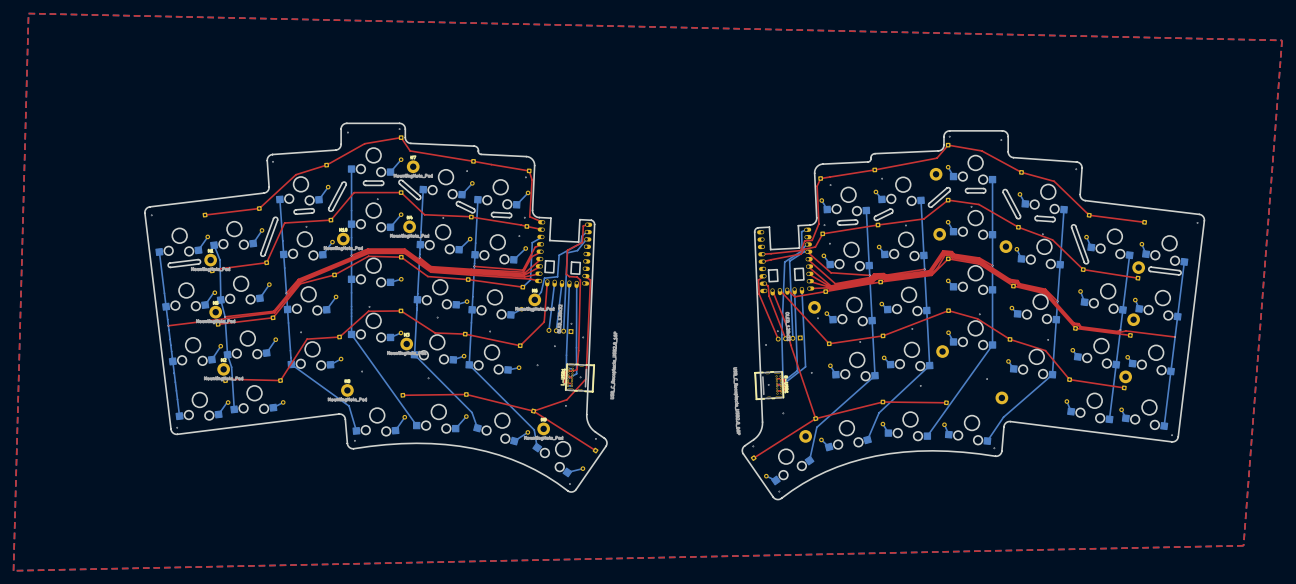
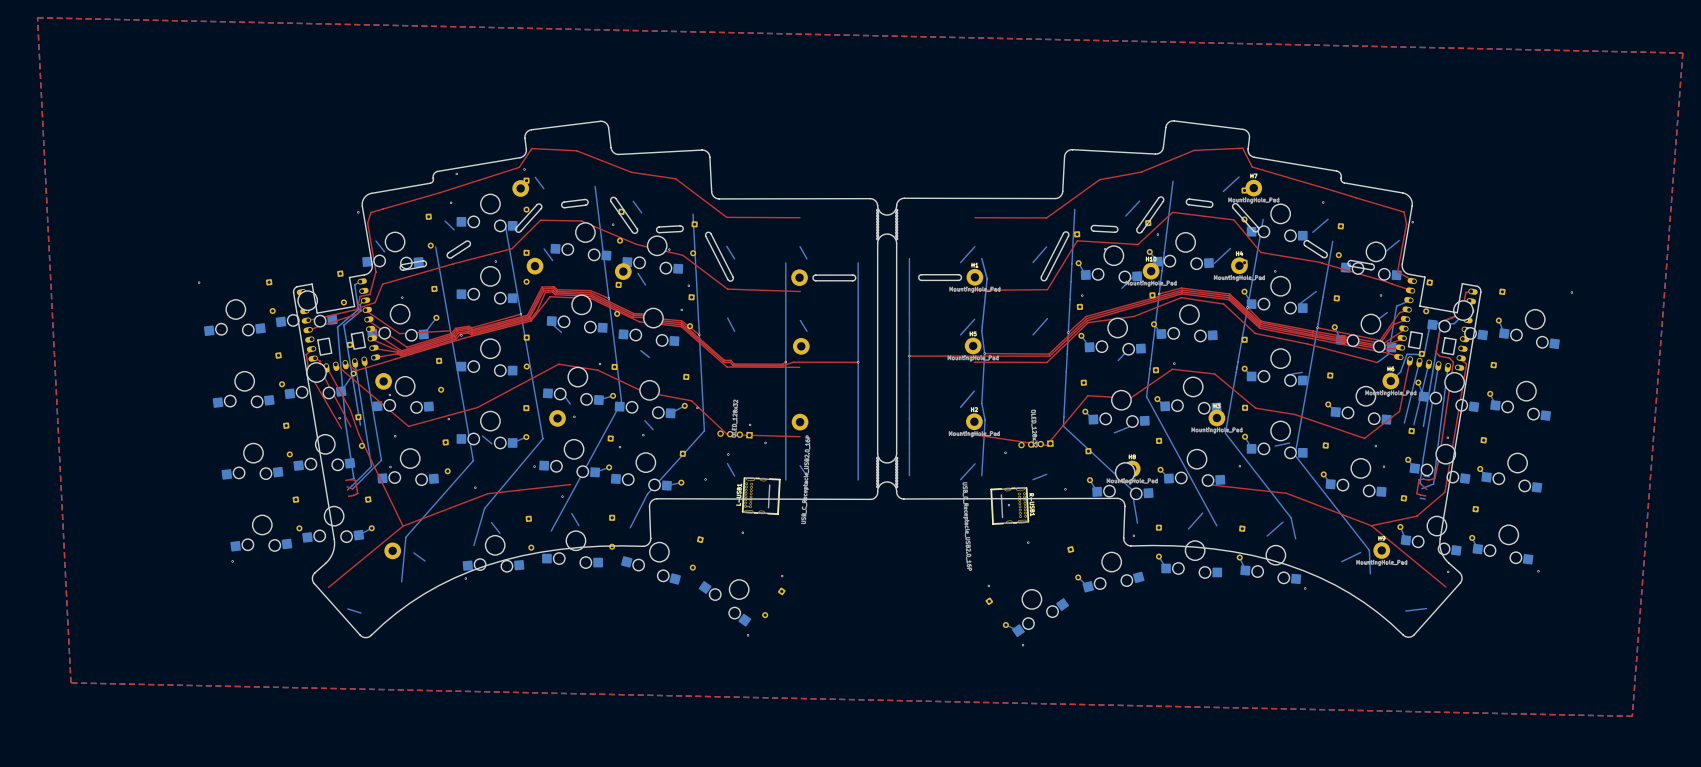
top zone outline: (28, 13) (13, 570) (1243, 545) -> (37, 17) (70, 682) (1632, 716)
bottom track: none -> (1239, 176) (1223, 191)
bottom track: none -> (535, 177) (543, 188)
via: (949, 136) -> none
bottom track: none -> (1173, 181) (1146, 396) (1216, 525)
via position: (1001, 140) -> (1323, 202)
bottom track: none -> (595, 186) (621, 401) (551, 531)
part: none -> (520, 188)
board edge: none -> (1158, 198) (1137, 228) (1138, 232) (1141, 232) (1163, 201) (1162, 197) (1158, 198)
board edge: none -> (584, 199) (563, 202) (561, 205) (564, 207) (585, 205) (588, 201) (584, 199)
board edge: none -> (615, 198) (637, 229) (636, 233) (632, 232) (611, 201) (612, 197) (615, 198)
board edge: none -> (1189, 199) (1210, 201) (1212, 205) (1209, 207) (1188, 204) (1186, 201) (1189, 199)
bottom track: none -> (633, 201) (641, 212)
bottom track: none -> (1139, 201) (1125, 216)
via: none -> (451, 202)
board edge: none -> (1237, 204) (1258, 227) (1257, 231) (1253, 231) (1233, 208) (1233, 204) (1237, 204)
board edge: none -> (536, 204) (516, 227) (516, 231) (520, 231) (541, 208) (540, 204) (536, 204)
board edge: none -> (877, 205) (875, 200) (870, 198) (717, 198) (712, 193) (709, 156) (705, 150) (616, 154) (611, 148) (607, 125) (601, 121) (531, 129) (525, 134) (526, 151) (521, 157) (437, 171) (433, 174) (433, 180) (430, 183) (371, 193) (365, 196) (362, 205) (372, 266) (369, 272) (364, 274)
board edge: none -> (896, 205) (899, 200) (904, 198) (1057, 198) (1062, 193) (1064, 155) (1069, 150) (1158, 153) (1163, 148) (1166, 125) (1172, 120) (1242, 129) (1248, 133) (1248, 150) (1252, 156) (1337, 171) (1340, 173) (1341, 180) (1343, 182) (1402, 192) (1408, 195) (1412, 204) (1402, 266) (1404, 271) (1409, 274)
bottom track: (401, 159) (390, 172) -> none
bottom track: none -> (1074, 209) (1063, 426) (1131, 489) (1137, 523)
bottom track: none -> (693, 214) (704, 430) (647, 494) (630, 527)
top track: none -> (800, 217) (726, 217) (675, 178) (631, 172) (576, 150) (531, 148) (519, 167) (370, 212) (367, 223) (376, 272)
top track: none -> (974, 217) (1046, 217) (1099, 179) (1141, 172) (1194, 150) (1242, 148) (1252, 167) (1404, 212) (1406, 224) (1397, 271) (1414, 281)
part position: (413, 166) -> (1253, 188)
bottom track: none -> (1263, 219) (1225, 433) (1291, 517) (1295, 538)
bottom track: none -> (1328, 219) (1312, 232)
bottom track: none -> (445, 221) (454, 229)
bottom track: (351, 169) (351, 334) (416, 425) -> none
bottom track: none -> (505, 224) (542, 438) (484, 508) (473, 545)
part: none -> (887, 224)
board edge: none -> (1094, 225) (1115, 226) (1117, 229) (1115, 232) (1093, 231) (1091, 228) (1094, 225)
board edge: none -> (680, 225) (658, 227) (656, 230) (659, 232) (680, 231) (683, 228) (680, 225)
part: (936, 174) -> none
via: (525, 177) -> none
board edge: none -> (1063, 233) (1041, 276) (1042, 280) (1046, 279) (1068, 236) (1067, 232) (1063, 233)
board edge: none -> (710, 233) (732, 276) (731, 280) (727, 279) (705, 236) (707, 232) (710, 233)
bottom track: (992, 179) (992, 345) (927, 436) -> none
board edge: (402, 180) (420, 196) (420, 199) (417, 199) (399, 183) (399, 180) (402, 180) -> none
board edge: (365, 181) (381, 181) (383, 183) (381, 185) (365, 185) (363, 182) (365, 181) -> none
bottom track: none -> (375, 240) (384, 251)
board edge: (342, 183) (328, 208) (330, 211) (332, 210) (346, 184) (345, 182) (342, 183) -> none
board edge: none -> (466, 241) (448, 253) (447, 257) (451, 257) (469, 246) (469, 242) (466, 241)
bottom track: (472, 183) (462, 194) -> none
board edge: none -> (1308, 241) (1326, 252) (1326, 256) (1323, 257) (1305, 245) (1304, 241) (1308, 241)
bottom track: none -> (1332, 241) (1295, 455) (1369, 550) (1370, 573)
bottom track: none -> (1399, 240) (1382, 254)
board edge: none -> (877, 243) (877, 453)
board edge: none -> (896, 243) (896, 453)
via position: (830, 185) -> (1105, 249)
bottom track: (328, 187) (318, 199) -> none
bottom track: none -> (726, 246) (734, 258)
bottom track: none -> (800, 246) (806, 258)
bottom track: none -> (974, 246) (960, 262)
bottom track: none -> (435, 246) (473, 460) (405, 537) (401, 581)
bottom track: none -> (1046, 246) (1032, 262)
board edge: (946, 188) (929, 203) (929, 206) (931, 206) (949, 191) (949, 188) (946, 188) -> none
board edge: (967, 188) (983, 188) (985, 191) (983, 192) (967, 192) (965, 190) (967, 188) -> none
bottom track: none -> (544, 248) (552, 260)
bottom track: (423, 189) (414, 354) (472, 412) (477, 428) -> none
bottom track: none -> (1230, 248) (1214, 263)
via: none -> (669, 249)
board edge: (1007, 190) (1020, 215) (1019, 218) (1016, 217) (1003, 192) (1004, 189) (1007, 190) -> none
bottom track: (528, 192) (516, 204) -> none
bottom track: (1019, 194) (1025, 203) -> none
bottom track: none -> (909, 258) (909, 475)
bottom track: none -> (981, 258) (987, 278) (981, 330) (984, 353) (981, 403) (985, 420) (981, 475)
board edge: none -> (423, 260) (402, 264) (400, 268) (403, 270) (424, 266) (426, 262) (423, 260)
board edge: none -> (1351, 260) (1372, 264) (1374, 267) (1371, 269) (1350, 266) (1348, 262) (1351, 260)
bottom track: (279, 199) (291, 364) (349, 406) (356, 430) -> none
bottom track: (477, 199) (469, 364) (534, 429) (537, 447) -> none
bottom track: none -> (785, 262) (785, 480)
bottom track: none -> (858, 262) (858, 480)
bottom track: (921, 200) (929, 365) (879, 412) (867, 439) -> none
top track: none -> (1321, 262) (1412, 290)
top track: none -> (1321, 262) (1260, 252) (1233, 219) (1172, 212) (1138, 244) (1077, 240) (1047, 289) (974, 290)
board edge: (459, 201) (474, 208) (474, 211) (472, 212) (457, 205) (456, 202) (459, 201) -> none
part: none -> (535, 266)
part: none -> (623, 271)
top track: none -> (375, 271) (369, 294) (360, 296) (356, 309) (308, 320)
board edge: (311, 208) (295, 209) (294, 212) (296, 214) (312, 213) (314, 210) (311, 208) -> none
bottom track: none -> (637, 273) (645, 285)
bottom track: none -> (1136, 273) (1121, 288)
board edge: none -> (815, 275) (853, 275) (855, 278) (852, 280) (815, 280) (813, 277) (815, 275)
board edge: none -> (921, 274) (958, 274) (961, 277) (958, 280) (921, 280) (918, 277) (921, 274)
board edge: (889, 209) (875, 216) (874, 219) (877, 220) (891, 213) (892, 210) (889, 209) -> none
bottom track: (1064, 209) (1052, 374) (1003, 417) (987, 441) -> none
bottom track: (866, 210) (875, 375) (816, 427) (809, 460) -> none
part: none -> (799, 277)
board edge: (493, 212) (509, 213) (511, 215) (509, 217) (493, 216) (491, 214) (493, 212) -> none
bottom track: none -> (360, 281) (354, 284) (358, 309) (337, 327) (345, 422) (353, 478) (350, 479)
bottom track: (401, 214) (390, 227) -> none
top track: (205, 215) (259, 208) (296, 174) (326, 165) (364, 143) (401, 137) (410, 150) (529, 170) (532, 179) (529, 216) (543, 222) -> none
top track: (471, 216) (424, 214) (401, 192) (354, 192) (330, 220) (284, 223) (266, 262) (211, 269) -> none
board edge: (1037, 216) (1053, 217) (1055, 219) (1053, 221) (1036, 220) (1034, 218) (1037, 216) -> none
via: (443, 217) -> none
top track: (471, 217) (542, 229) -> none
board edge: (539, 217) (535, 215) (532, 211) (534, 164) (530, 158) (480, 154) (474, 146) (409, 143) (405, 139) (404, 126) (399, 123) (345, 123) (341, 127) (341, 145) (337, 149) (270, 155) (267, 159) (269, 188) (265, 192) (147, 207) (144, 213) (171, 431) (177, 434) (340, 414) (345, 418) (347, 444) (351, 448) (416, 443) (473, 448) (499, 455) (523, 464) (546, 476) (568, 491) (574, 491) (606, 443) (605, 439) (590, 427) (586, 416) (594, 224) (591, 220) -> none
board edge: none -> (297, 286) (293, 292) (334, 541) (331, 556) (313, 574) (312, 579) (363, 637) (369, 636) (396, 612) (424, 593) (454, 577) (487, 565) (522, 555) (560, 549) (646, 545) (650, 539) (649, 504) (655, 498) (870, 499) (875, 496) (877, 491)
board edge: (273, 218) (260, 253) (262, 256) (264, 254) (277, 220) (276, 217) (273, 218) -> none
board edge: none -> (1477, 286) (1480, 292) (1439, 540) (1443, 556) (1460, 573) (1461, 579) (1411, 636) (1404, 636) (1377, 612) (1349, 593) (1319, 577) (1286, 564) (1251, 555) (1213, 548) (1128, 545) (1123, 539) (1124, 504) (1119, 498) (903, 498) (898, 496) (896, 491)
board edge: (855, 219) (839, 220) (837, 223) (839, 225) (856, 224) (857, 221) (855, 219) -> none
top track: none -> (1471, 291) (1465, 292) (1462, 313) (1441, 321) (1436, 352) (1439, 356) (1449, 358) (1453, 362) (1434, 478) (1419, 479) (1416, 493) (1425, 495)
top track: none -> (800, 291) (727, 289) (682, 255) (636, 244) (581, 220) (540, 220) (512, 248) (382, 284) (375, 302) (360, 307) (357, 313) (310, 329)
bottom track: none -> (1316, 291) (1300, 303)
top track: (1144, 222) (1089, 215) (1054, 181) (1021, 172) (981, 150) (948, 145) (936, 158) (820, 178) (817, 186) (818, 224) -> none
top track: (818, 223) (812, 240) (804, 240) (801, 250) (763, 254) -> none
top track: none -> (1159, 293) (1181, 288) (1229, 293) (1260, 322) (1380, 345) (1405, 328)
via: none -> (1159, 293)
top track: (587, 224) (583, 226) (582, 242) (567, 250) (566, 274) (580, 279) (577, 369) (565, 371) (564, 382) (571, 383) -> none
board edge: (809, 225) (814, 223) (816, 219) (814, 172) (818, 165) (868, 161) (874, 153) (939, 150) (943, 146) (944, 133) (949, 130) (1003, 131) (1007, 134) (1008, 152) (1011, 157) (1078, 162) (1082, 167) (1080, 195) (1083, 200) (1201, 215) (1204, 220) (1177, 439) (1171, 441) (1009, 421) (1004, 425) (1001, 451) (997, 456) (932, 450) (876, 456) (850, 462) (825, 471) (802, 483) (780, 498) (775, 498) (742, 450) (743, 446) (758, 434) (762, 423) (754, 232) (757, 227) -> none
via: (905, 225) -> none
part position: (409, 226) -> (1239, 265)
board edge: (1075, 226) (1088, 260) (1087, 263) (1084, 262) (1071, 227) (1072, 224) (1075, 226) -> none
top track: none -> (608, 298) (590, 290) (557, 289) (554, 286) (542, 287) (527, 315) (472, 329) (468, 327) (456, 329) (452, 334) (401, 350) (368, 329)
via: none -> (608, 298)
bottom track: none -> (1410, 300) (1396, 306) (1388, 354) (1377, 362)
bottom track: none -> (363, 300) (360, 304) (361, 310) (343, 325) (360, 425)
bottom track: (806, 229) (801, 231) (802, 250) (784, 262) (781, 334) (782, 378) (780, 378) -> none
bottom track: none -> (1469, 300) (1462, 305) (1460, 314) (1429, 326) (1424, 354) (1406, 354) (1400, 371) (1390, 380)
bottom track: (262, 230) (253, 243) -> none
bottom track: (586, 232) (581, 236) (580, 243) (559, 255) (557, 276) (544, 278) (541, 292) (534, 299) -> none
part: (939, 234) -> none
top track: none -> (1247, 307) (1261, 321) (1380, 343) (1393, 324) (1407, 319)
via: none -> (1247, 307)
via position: (1042, 234) -> (1380, 295)
bottom track: (207, 236) (198, 250) -> none
top track: none -> (365, 310) (399, 333) (450, 330)
top track: none -> (1409, 309) (1399, 312) (1380, 340) (1317, 327)
bottom track: none -> (1467, 310) (1454, 323) (1440, 324) (1423, 426)
bottom track: (542, 237) (532, 242) (530, 279) (522, 287) -> none
bottom track: (1086, 237) (1091, 247) -> none
bottom track: none -> (1387, 312) (1369, 325)
part position: (343, 239) -> (1151, 271)
top track: none -> (520, 314) (472, 327) (468, 326) (455, 328) (451, 333) (407, 347) (367, 319)
via: none -> (520, 314)
bottom track: (470, 239) (459, 249) -> none
bottom track: (586, 239) (577, 250) (567, 252) (563, 331) -> none
bottom track: none -> (727, 318) (734, 331)
bottom track: none -> (1047, 318) (1032, 334)
bottom track: none -> (974, 319) (960, 334)
via: (829, 243) -> none
top track: (541, 244) (535, 247) (522, 270) (474, 266) -> none
bottom track: none -> (800, 320) (806, 331)
bottom track: (806, 244) (803, 247) (803, 251) (789, 261) (792, 338) -> none
bottom track: (214, 245) (220, 260) (220, 299) (225, 316) (227, 354) (231, 367) (234, 409) -> none
part: none -> (338, 323)
part: (1005, 246) -> none
part: none -> (1435, 323)
bottom track: none -> (553, 325) (561, 332)
bottom track: (525, 248) (513, 259) -> none
via: none -> (1317, 327)
bottom track: (159, 251) (179, 416) -> none
top track: (541, 251) (531, 256) (523, 272) (431, 266) (419, 257) -> none
top track: (807, 251) (831, 272) (869, 275) -> none
part: (563, 252) -> none
top track: none -> (1068, 332) (1086, 316) (1182, 290) (1229, 295) (1260, 324) (1380, 347) (1404, 338)
via: none -> (1068, 332)
top track: (351, 255) (367, 249) (404, 249) (430, 267) (523, 274) (541, 259) -> none
top track: none -> (699, 334) (681, 320) (647, 317) (644, 313) (634, 313) (590, 292) (556, 291) (553, 288) (543, 288) (528, 316) (472, 331) (468, 329) (457, 331) (453, 336) (401, 352) (370, 338)
via: none -> (699, 334)
bottom track: (1129, 255) (1109, 419) -> none
via: (419, 257) -> none
board edge: (198, 259) (169, 263) (168, 265) (170, 267) (198, 263) (200, 261) (198, 259) -> none
top track: (807, 259) (835, 283) (870, 277) (873, 273) (886, 275) (924, 269) -> none
part position: (210, 260) -> (974, 277)
part: (785, 260) -> none
top track: (763, 261) (801, 253) (803, 249) (815, 247) (822, 233) (923, 218) (948, 200) (978, 204) (1018, 227) (1052, 239) (1083, 269) (1137, 278) -> none
bottom track: (1184, 261) (1164, 426) -> none
part: none -> (801, 346)
bottom track: none -> (1132, 345) (1118, 360)
top track: none -> (313, 348) (306, 354) (309, 373) (341, 428)
top track: none -> (372, 348) (401, 354) (454, 337) (458, 332) (468, 331) (471, 333) (529, 317) (543, 290) (553, 290) (556, 292) (590, 294) (633, 315) (643, 315) (646, 319) (681, 322) (724, 360) (730, 360) (734, 363) (782, 364) (785, 362)
top track: (992, 265) (979, 258) (943, 250) (929, 270) (886, 276) (874, 275) (870, 278) (831, 285) (808, 266) -> none
via: (992, 265) -> none
top track: none -> (1402, 347) (1381, 349) (1260, 326) (1229, 297) (1181, 291) (1086, 318) (1048, 354) (984, 353)
via: (474, 266) -> none
top track: (540, 266) (523, 275) (430, 269) (404, 250) (368, 250) (298, 279) (286, 293) -> none
bottom track: none -> (640, 350) (649, 357)
part: (1138, 267) -> none
board edge: (1151, 267) (1179, 270) (1181, 273) (1178, 274) (1150, 271) (1148, 268) (1151, 267) -> none
via: none -> (984, 353)
via: (924, 269) -> none
top track: none -> (909, 356) (1049, 356) (1087, 320) (1181, 293) (1228, 299) (1259, 328) (1388, 353) (1400, 357)
via: none -> (909, 356)
top track: none -> (315, 358) (319, 361) (322, 374) (350, 426)
top track: none -> (373, 357) (397, 353) (401, 355) (455, 339) (460, 334) (468, 332) (471, 334) (530, 319) (537, 310) (545, 292) (552, 291) (555, 294) (590, 296) (633, 317) (642, 317) (646, 320) (681, 324) (724, 362) (730, 362) (733, 365) (782, 365) (793, 362) (858, 362)
top track: none -> (1459, 357) (1466, 364) (1444, 492) (1416, 516) (1371, 525)
bottom track: none -> (364, 359) (381, 460) (352, 489)
top track: (540, 273) (524, 276) (430, 270) (404, 251) (368, 251) (299, 280) (273, 311) (225, 316) -> none
top track: (808, 273) (830, 287) (871, 279) (875, 276) (886, 277) (930, 271) (943, 252) (951, 252) (953, 255) (979, 259) (1010, 279) (1018, 280) (1020, 283) (1045, 289) (1057, 301) -> none
top track: none -> (1410, 359) (1399, 411) (1364, 438) (1294, 414) (1255, 408) (1214, 374) (1172, 369) (1130, 398) (1087, 395) (1046, 445) (975, 434)
bottom track: none -> (1419, 360) (1404, 423)
bottom track: none -> (354, 361) (371, 466) (347, 489)
via: none -> (785, 362)
top track: none -> (974, 362) (1047, 362) (1088, 322) (1133, 316) (1181, 297) (1223, 304) (1255, 333) (1307, 343) (1377, 362)
via: (869, 275) -> none
top track: none -> (345, 362) (356, 370) (465, 337) (531, 320) (550, 296) (591, 298) (639, 321) (681, 326) (726, 367) (799, 367)
top track: (584, 276) (590, 280) (585, 379) (567, 399) (533, 411) -> none
via: none -> (858, 362)
top track: (764, 276) (758, 280) (759, 294) (778, 339) -> none
bottom track: none -> (1429, 362) (1413, 424)
top track: none -> (335, 364) (408, 426) (477, 407) (558, 364) (597, 370) (643, 391) (691, 400) (727, 434) (800, 436)
via: none -> (600, 363)
via: none -> (1174, 363)
bottom track: none -> (1438, 364) (1423, 458) (1420, 483) (1422, 485)
top track: none -> (326, 366) (350, 410) (358, 434) (403, 526)
bottom track: none -> (1448, 365) (1433, 484) (1421, 488)
bottom track: (401, 279) (390, 282) -> none
top track: (540, 281) (430, 272) (404, 253) (368, 253) (299, 282) (274, 312) (168, 325) -> none
top track: (547, 281) (544, 322) (520, 345) (465, 334) (435, 332) (401, 310) (368, 311) (339, 337) (307, 339) (280, 380) (225, 379) -> none
bottom track: (554, 281) (548, 330) -> none
top track: (808, 281) (830, 288) (872, 280) (875, 277) (885, 279) (930, 273) (944, 253) (951, 254) (953, 256) (978, 260) (1009, 280) (1017, 281) (1019, 284) (1045, 290) (1074, 323) (1079, 323) (1081, 326) (1117, 331) (1120, 330) -> none
bottom track: (562, 282) (556, 330) -> none
bottom track: (569, 282) (566, 355) (566, 374) (568, 375) -> none
bottom track: (576, 283) (576, 373) (568, 378) -> none
top track: (764, 283) (768, 286) (769, 296) (785, 338) -> none
bottom track: none -> (1302, 372) (1287, 374)
top track: (522, 287) (427, 276) (401, 257) (368, 256) (334, 274) (300, 283) (273, 317) (218, 324) -> none
bottom track: (801, 288) (805, 366) (781, 385) -> none
top track: (809, 288) (827, 287) (830, 289) (872, 282) (876, 278) (885, 280) (931, 274) (945, 255) (950, 255) (952, 257) (978, 262) (1018, 286) (1044, 292) (1073, 324) (1078, 325) (1080, 327) (1175, 337) -> none
top track: (787, 289) (794, 296) (931, 275) (948, 258) (979, 264) (1013, 286) (1044, 293) (1075, 328) (1130, 335) -> none
bottom track: (794, 289) (797, 370) (777, 386) -> none
part: none -> (383, 381)
top track: (772, 290) (786, 326) (790, 345) (815, 418) -> none
top track: (779, 290) (829, 343) (883, 335) (948, 310) (977, 318) (1010, 339) (1045, 350) (1069, 379) (1124, 387) -> none
bottom track: (214, 291) (205, 304) -> none
via position: (286, 293) -> (389, 395)
bottom track: (336, 296) (326, 309) -> none
bottom track: none -> (974, 391) (960, 407)
bottom track: none -> (562, 392) (570, 404)
part position: (534, 299) -> (1390, 380)
via: (369, 306) -> none
part: (814, 307) -> none
part position: (215, 312) -> (973, 345)
via: (979, 314) -> none
via: (225, 316) -> none
via: none -> (339, 418)
part: none -> (557, 418)
via: (817, 318) -> none
via: none -> (448, 419)
part: (1133, 319) -> none
bottom track: none -> (644, 420) (653, 429)
part: none -> (800, 422)
via: (168, 325) -> none
bottom track: none -> (1129, 427) (1114, 432)
via: (912, 328) -> none
via: (1120, 330) -> none
via: (777, 331) -> none
bottom track: none -> (482, 436) (491, 443)
via: none -> (1447, 437)
bottom track: none -> (1289, 442) (1275, 446)
via: (1175, 337) -> none
bottom track: (275, 339) (266, 352) -> none
via: none -> (619, 447)
via: (860, 341) -> none
part position: (406, 344) -> (1216, 418)
bottom track: (220, 346) (211, 359) -> none
part: (942, 351) -> none
bottom track: none -> (727, 463) (734, 476)
bottom track: none -> (975, 463) (960, 479)
bottom track: none -> (800, 465) (806, 476)
via: none -> (390, 467)
via: none -> (534, 466)
via: none -> (1239, 466)
via: none -> (1383, 466)
bottom track: (341, 359) (330, 364) -> none
part: none -> (887, 472)
bottom track: none -> (1046, 474) (1032, 479)
bottom track: none -> (1424, 475) (1429, 476)
top track: none -> (345, 480) (355, 480) (357, 493) (348, 496)
bottom track: (568, 368) (572, 368) -> none
top track: none -> (1203, 484) (1286, 493) (1371, 525)
part position: (223, 369) -> (974, 421)
top track: none -> (570, 484) (487, 493) (403, 526)
top track: none -> (1422, 485) (1426, 489)
top track: none -> (346, 486) (352, 489)
top track: (568, 375) (572, 378) -> none
part: (1125, 376) -> none
via: (580, 377) -> none
top track: (776, 378) (783, 379) (784, 389) (777, 391) -> none
via: (987, 379) -> none
bottom track: none -> (1420, 498) (1425, 499)
top track: (777, 383) (781, 385) -> none
via: (920, 385) -> none
part position: (347, 390) -> (1132, 468)
bottom track: none -> (1202, 513) (1188, 529)
bottom track: none -> (571, 513) (578, 525)
top track: (402, 395) (466, 394) (533, 411) -> none
bottom track: none -> (1283, 522) (1267, 536)
part: (1001, 397) -> none
bottom track: none -> (491, 522) (499, 533)
top track: none -> (403, 526) (328, 587)
top track: none -> (1371, 525) (1445, 587)
bottom track: (228, 401) (218, 414) -> none
top track: (946, 402) (882, 402) (815, 418) -> none
via: none -> (1133, 535)
top track: (533, 411) (595, 450) -> none
bottom track: (466, 416) (455, 428) -> none
bottom track: (404, 417) (395, 430) -> none
top track: (815, 418) (753, 458) -> none
part: none -> (392, 550)
bottom track: none -> (1360, 552) (1341, 561)
bottom track: none -> (413, 552) (424, 560)
part position: (543, 428) -> (1381, 550)
bottom track: (527, 432) (514, 441) -> none
via: none -> (1448, 571)
part: (805, 436) -> none
bottom track: none -> (347, 608) (360, 613)
bottom track: none -> (1426, 608) (1405, 611)
bottom track: (582, 468) (567, 472) -> none

